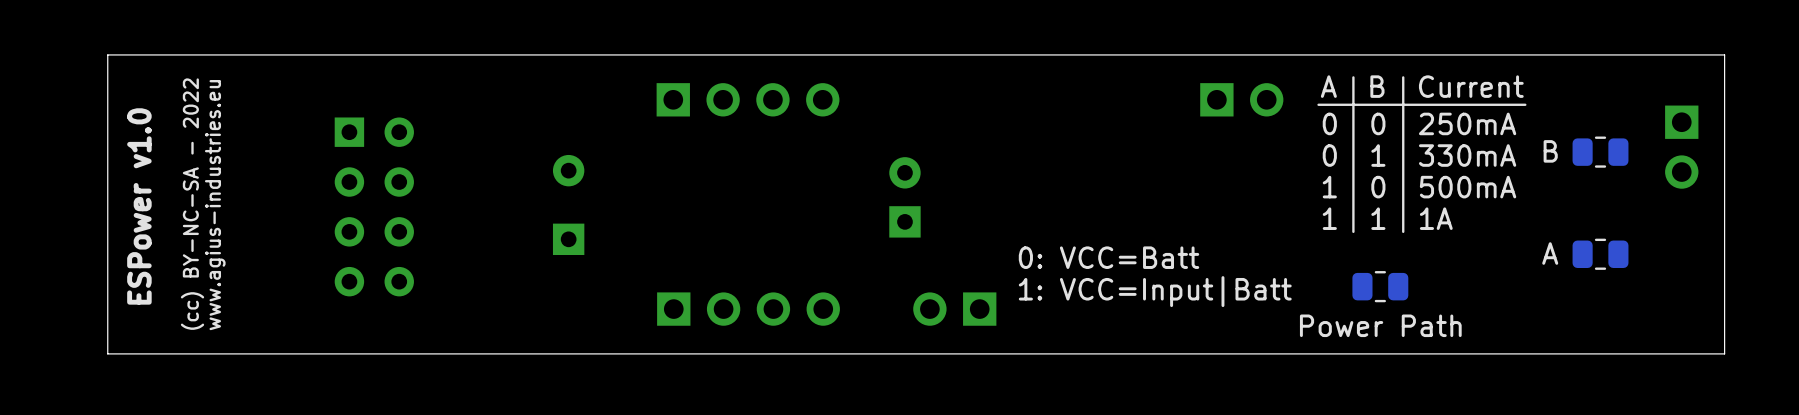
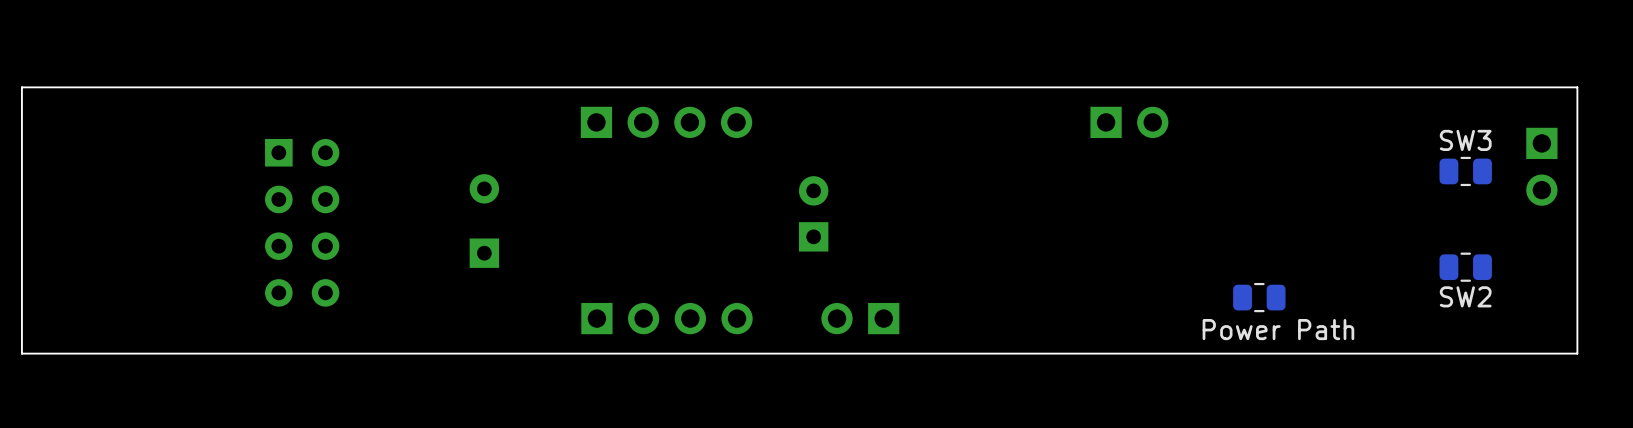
board edge: (1724, 54) (107, 54) (107, 353) (1724, 353) (1724, 54) -> (1577, 87) (1577, 353) (21, 353) (21, 87) (1577, 87)
line: (1353, 77) (1353, 231) -> none
line: (1403, 77) (1403, 231) -> none
text: A B Current (1422, 86) -> none
line: (1525, 104) (1318, 104) -> none
text: 0 0 250mA (1419, 123) -> none
B name: B (1550, 151) -> SW3 (1465, 140)
text: 0 1 330mA (1419, 155) -> none
text: 1 0 500mA (1419, 187) -> none
text: (cc) BY-NC-SA - 2022 (192, 204) -> none
part position: (568, 204) -> (484, 221)
text: www.agius-industries.eu (215, 205) -> none
text: ESPower v1.0 (139, 206) -> none
part position: (374, 206) -> (302, 222)
text: 1 1 1A (1387, 218) -> none
A name: A (1550, 253) -> SW2 (1465, 296)
text: 0: VCC=Batt (1109, 257) -> none
text: 1: VCC=Input|Batt (1155, 291) -> none
Power Path name position: Power Path (1380, 325) -> Power Path (1278, 329)

